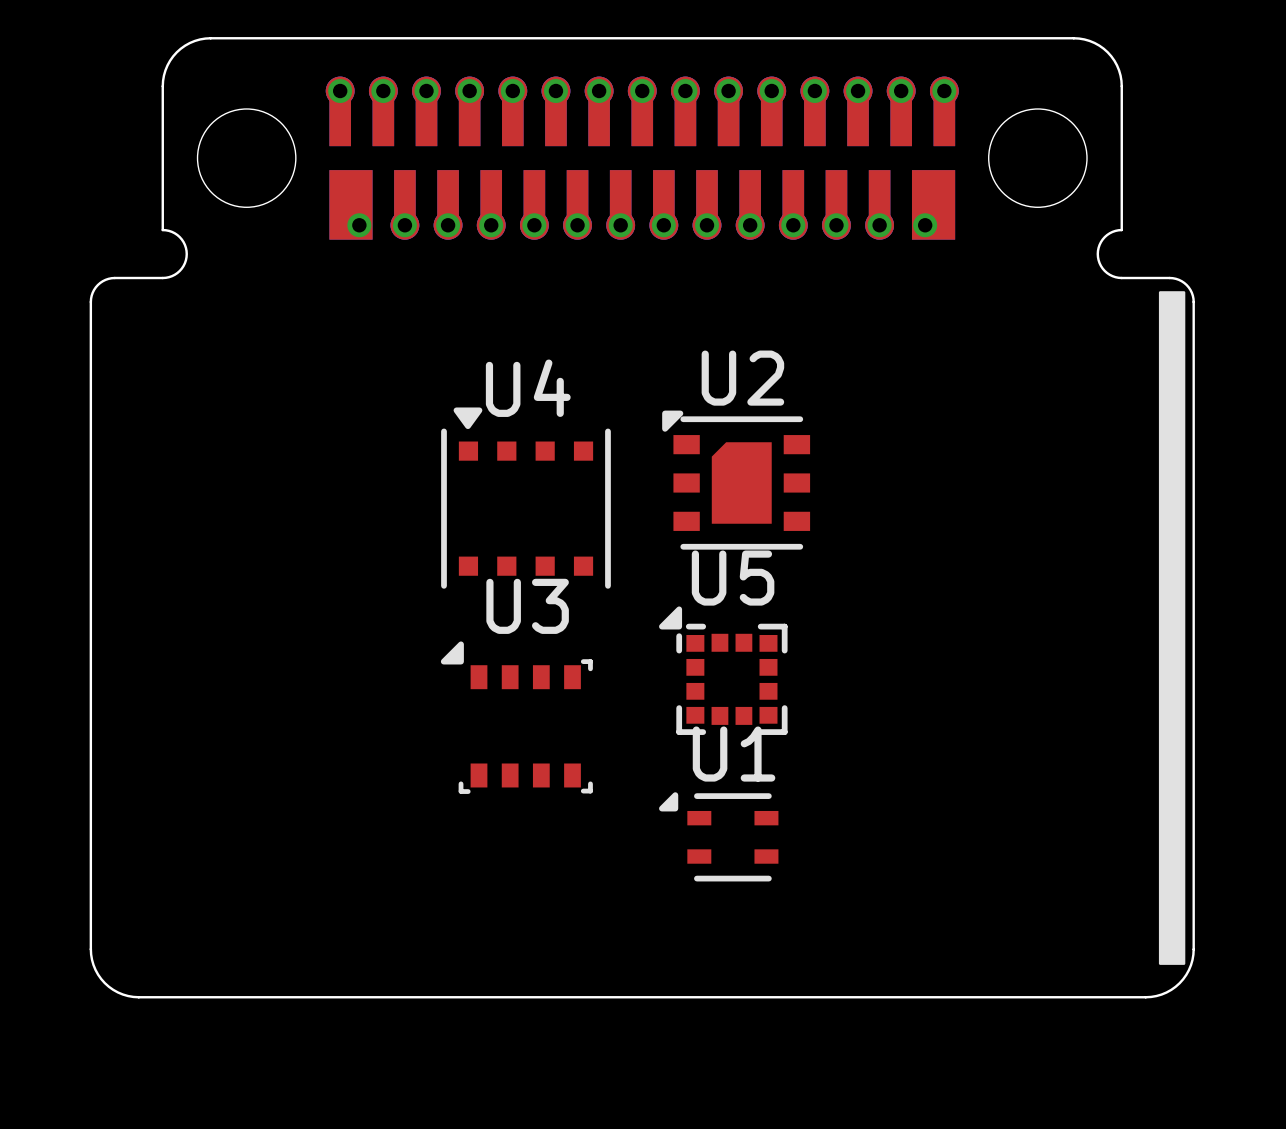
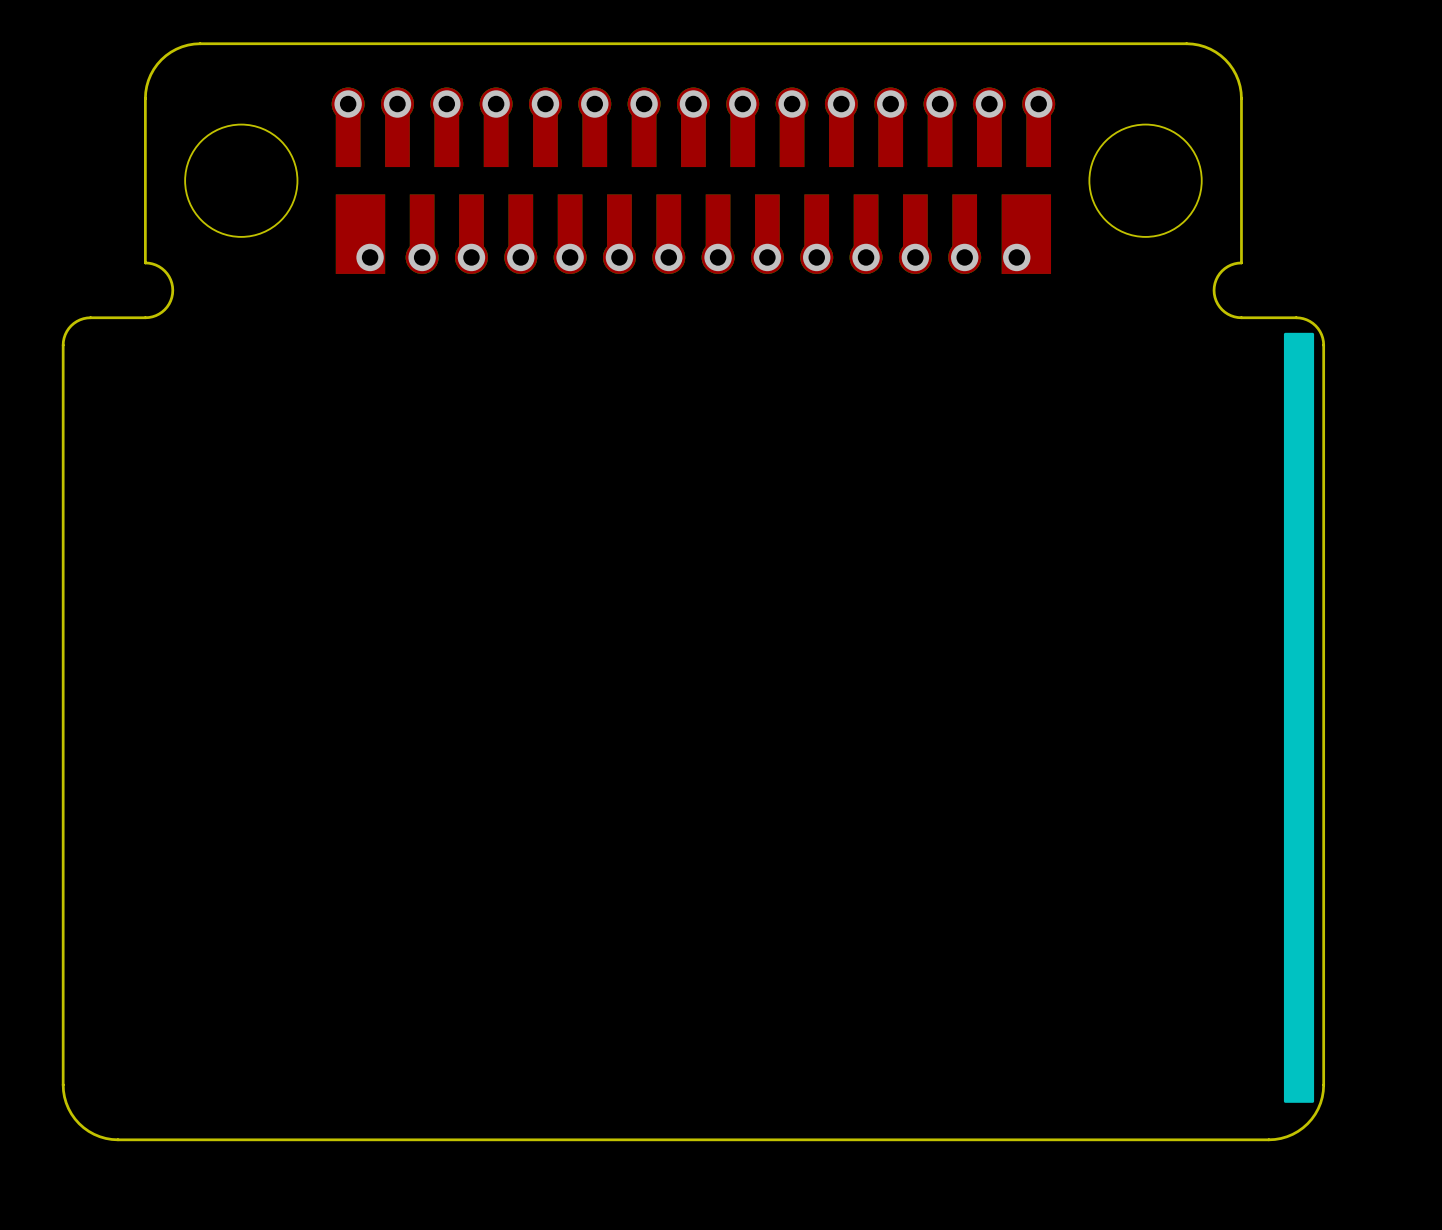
U2: (736, 480) -> none
U4: (525, 498) -> none
U5: (723, 670) -> none
U3: (516, 717) -> none
U1: (718, 836) -> none

